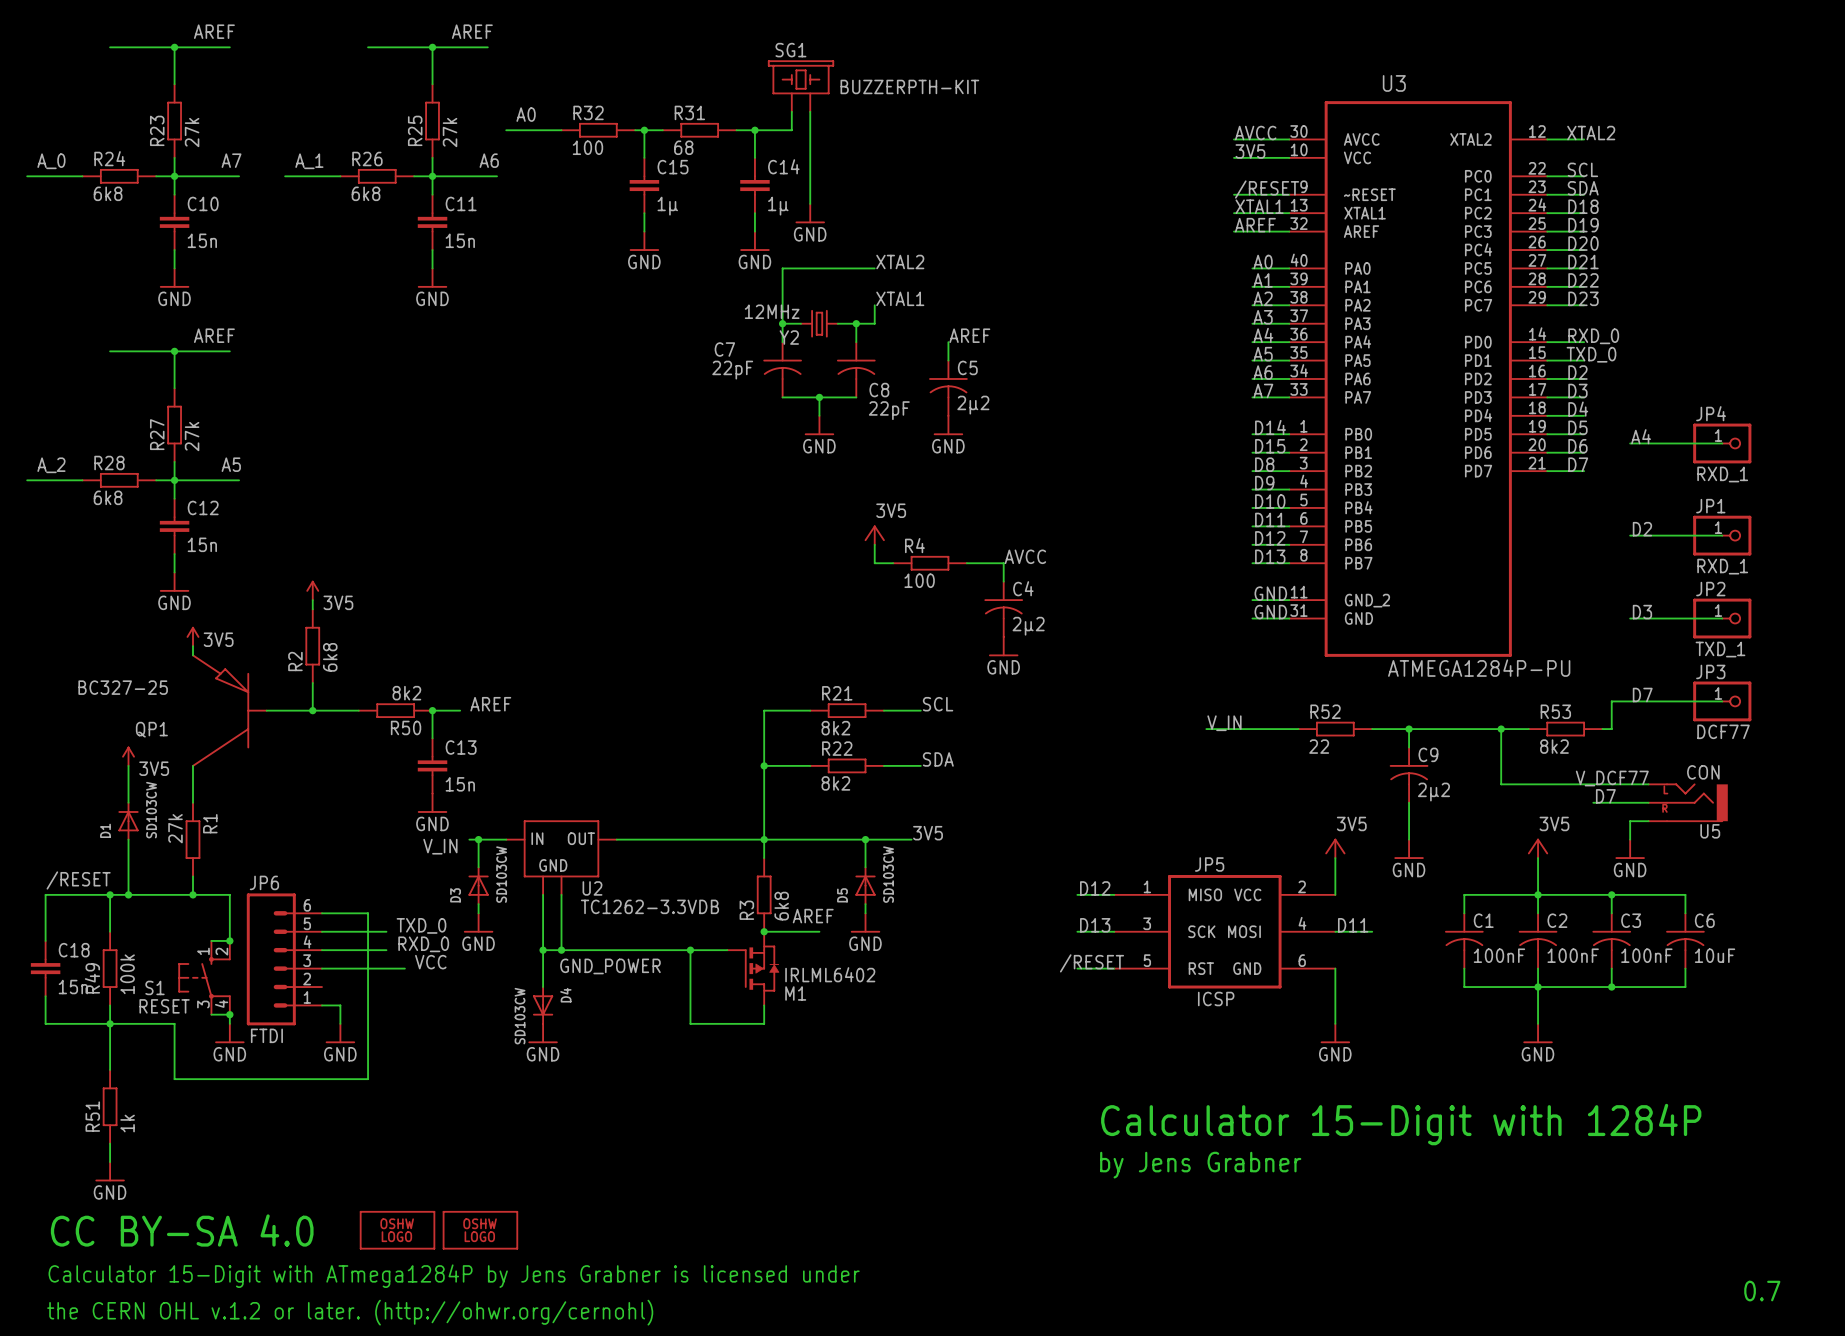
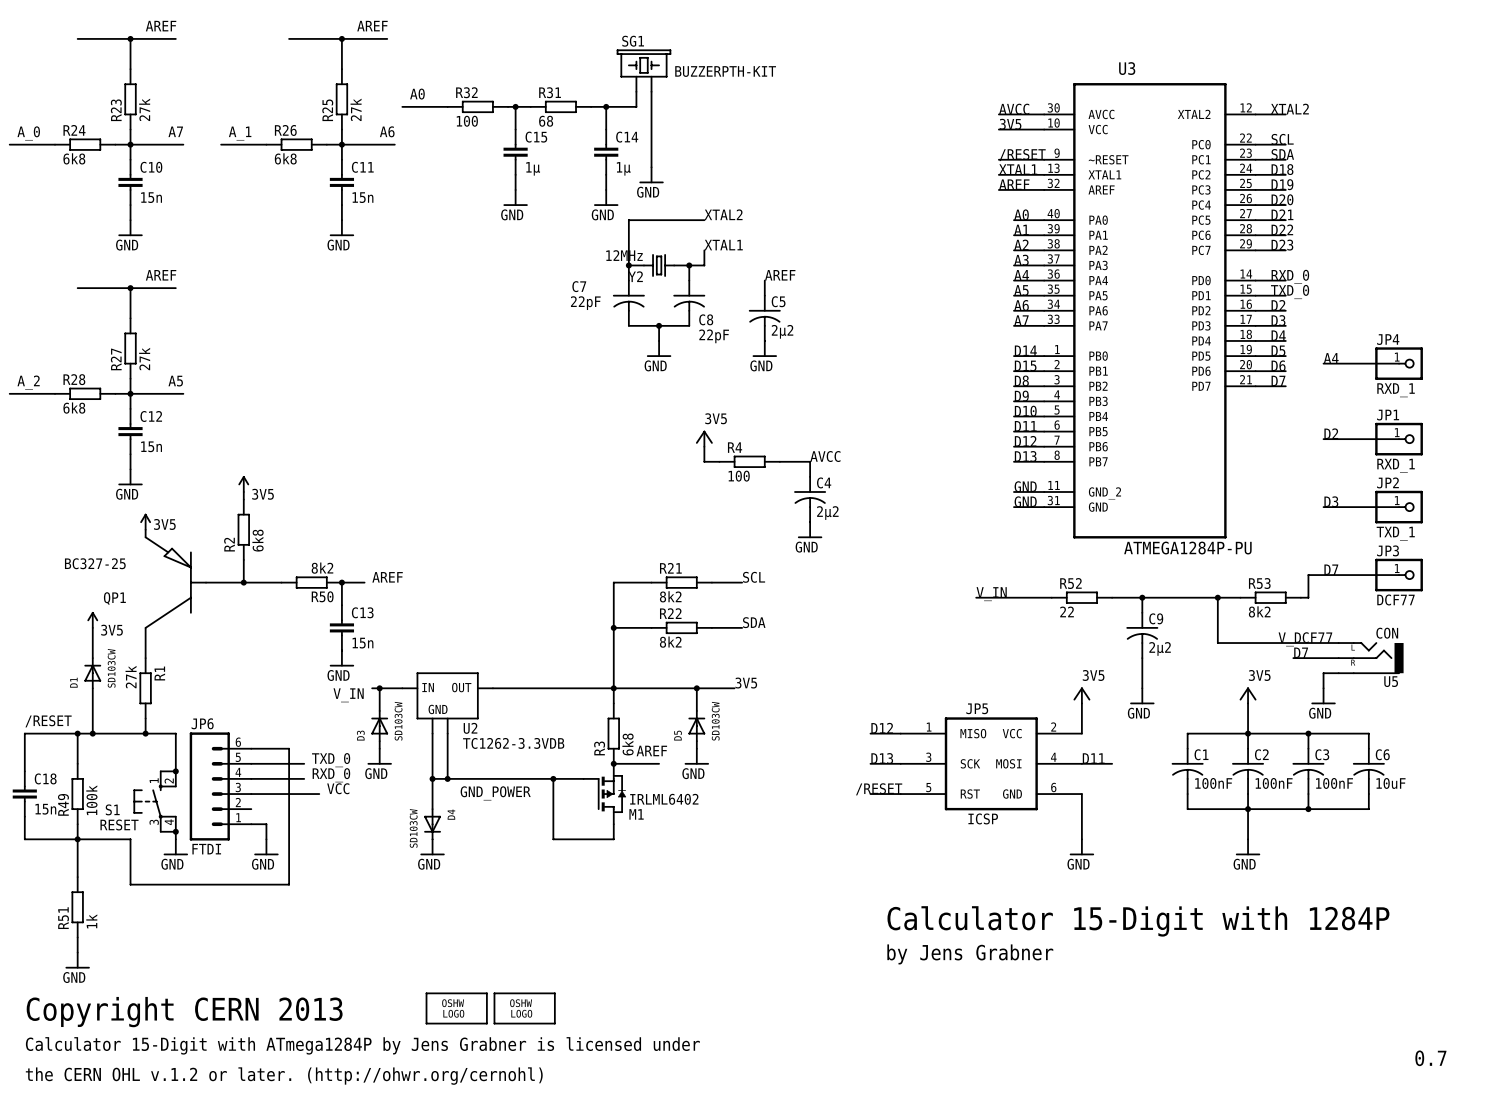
text: CC BY-SA 4.0 (182, 1230) -> Copyright CERN 2013 (184, 1012)
part: (397, 1230) -> none
part: (480, 1230) -> none
part: none -> (456, 1008)
part: none -> (524, 1008)

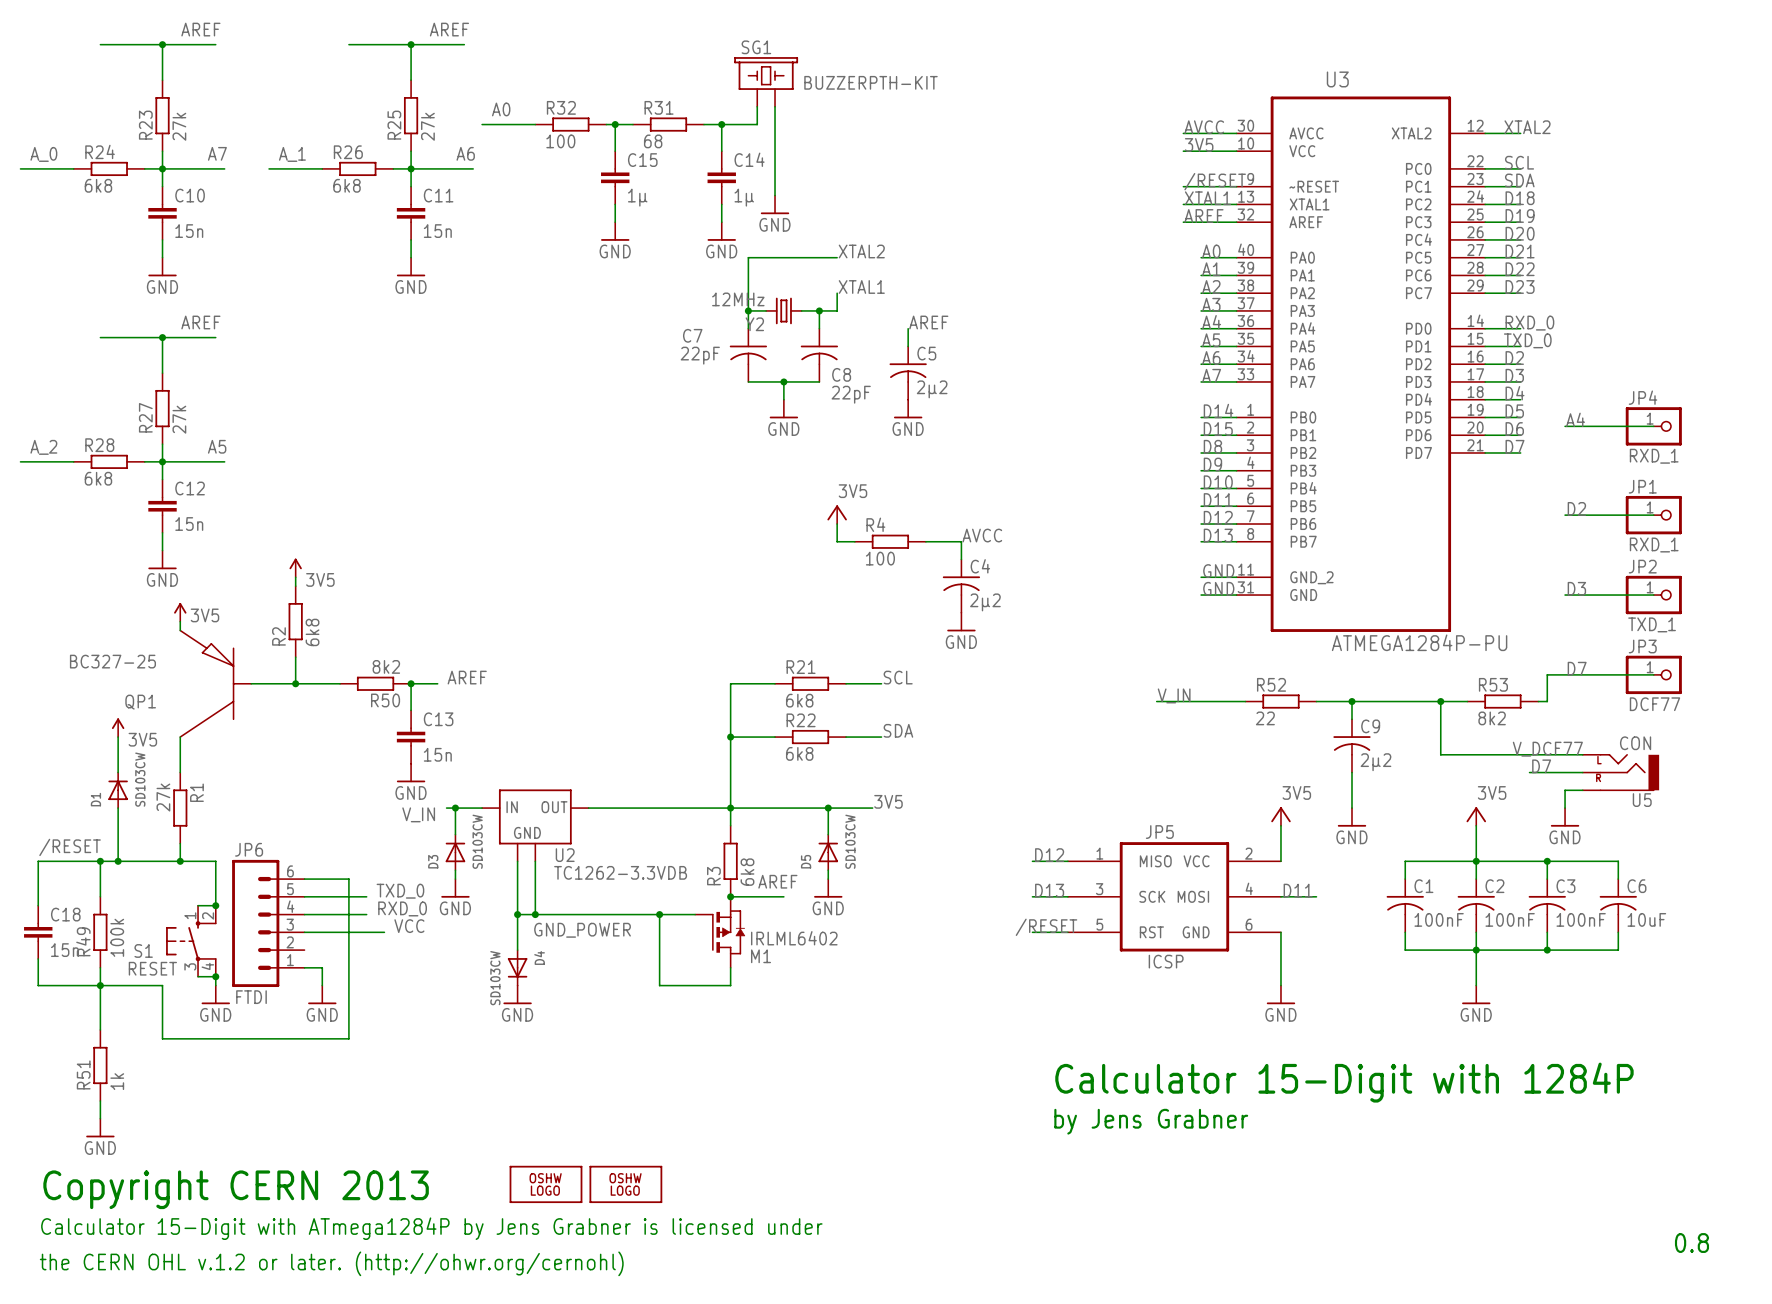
R21 value: 8k2 (670, 596) -> 6k8 (799, 700)
R22 value: 8k2 (670, 642) -> 6k8 (799, 753)
text: 0.7 (1430, 1058) -> 0.8 (1691, 1243)

